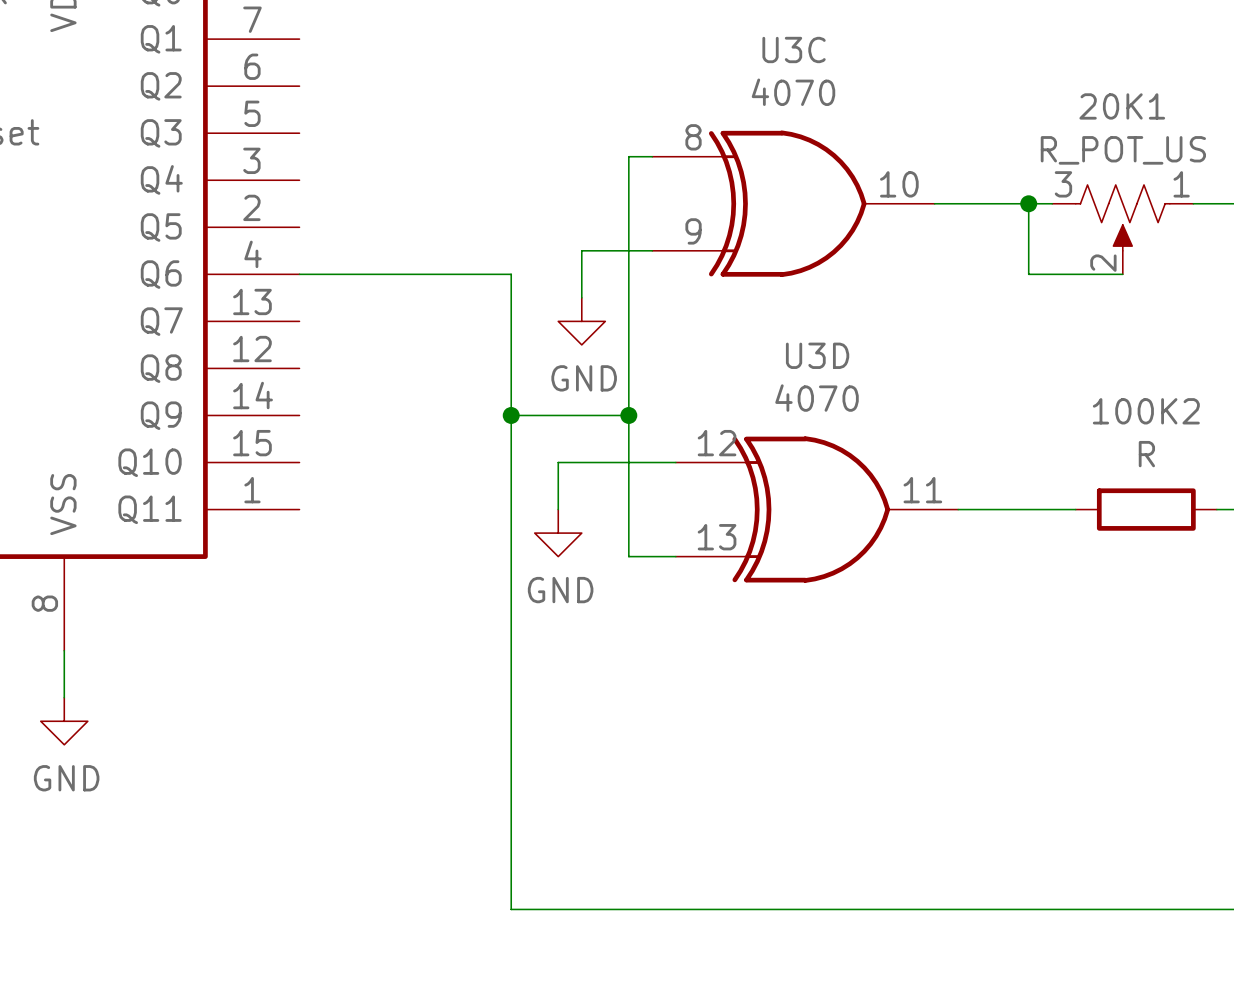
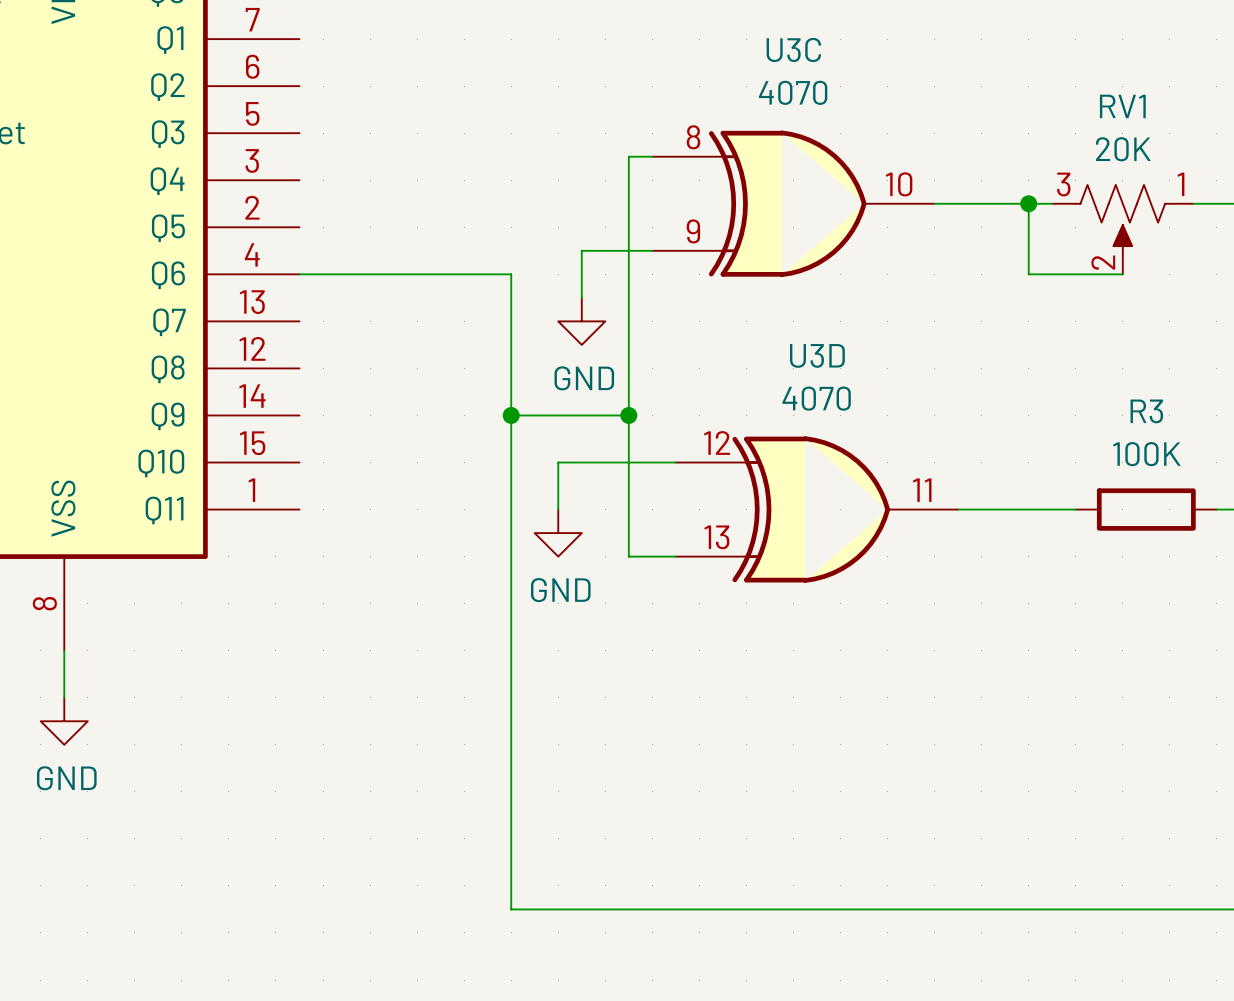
20K1 name: 20K1 (1122, 106) -> RV1 (1122, 106)
20K1 value: R_POT_US (1123, 150) -> 20K (1123, 149)
100K2 name: 100K2 (1146, 411) -> R3 (1146, 411)
100K2 value: R (1146, 454) -> 100K (1146, 454)

